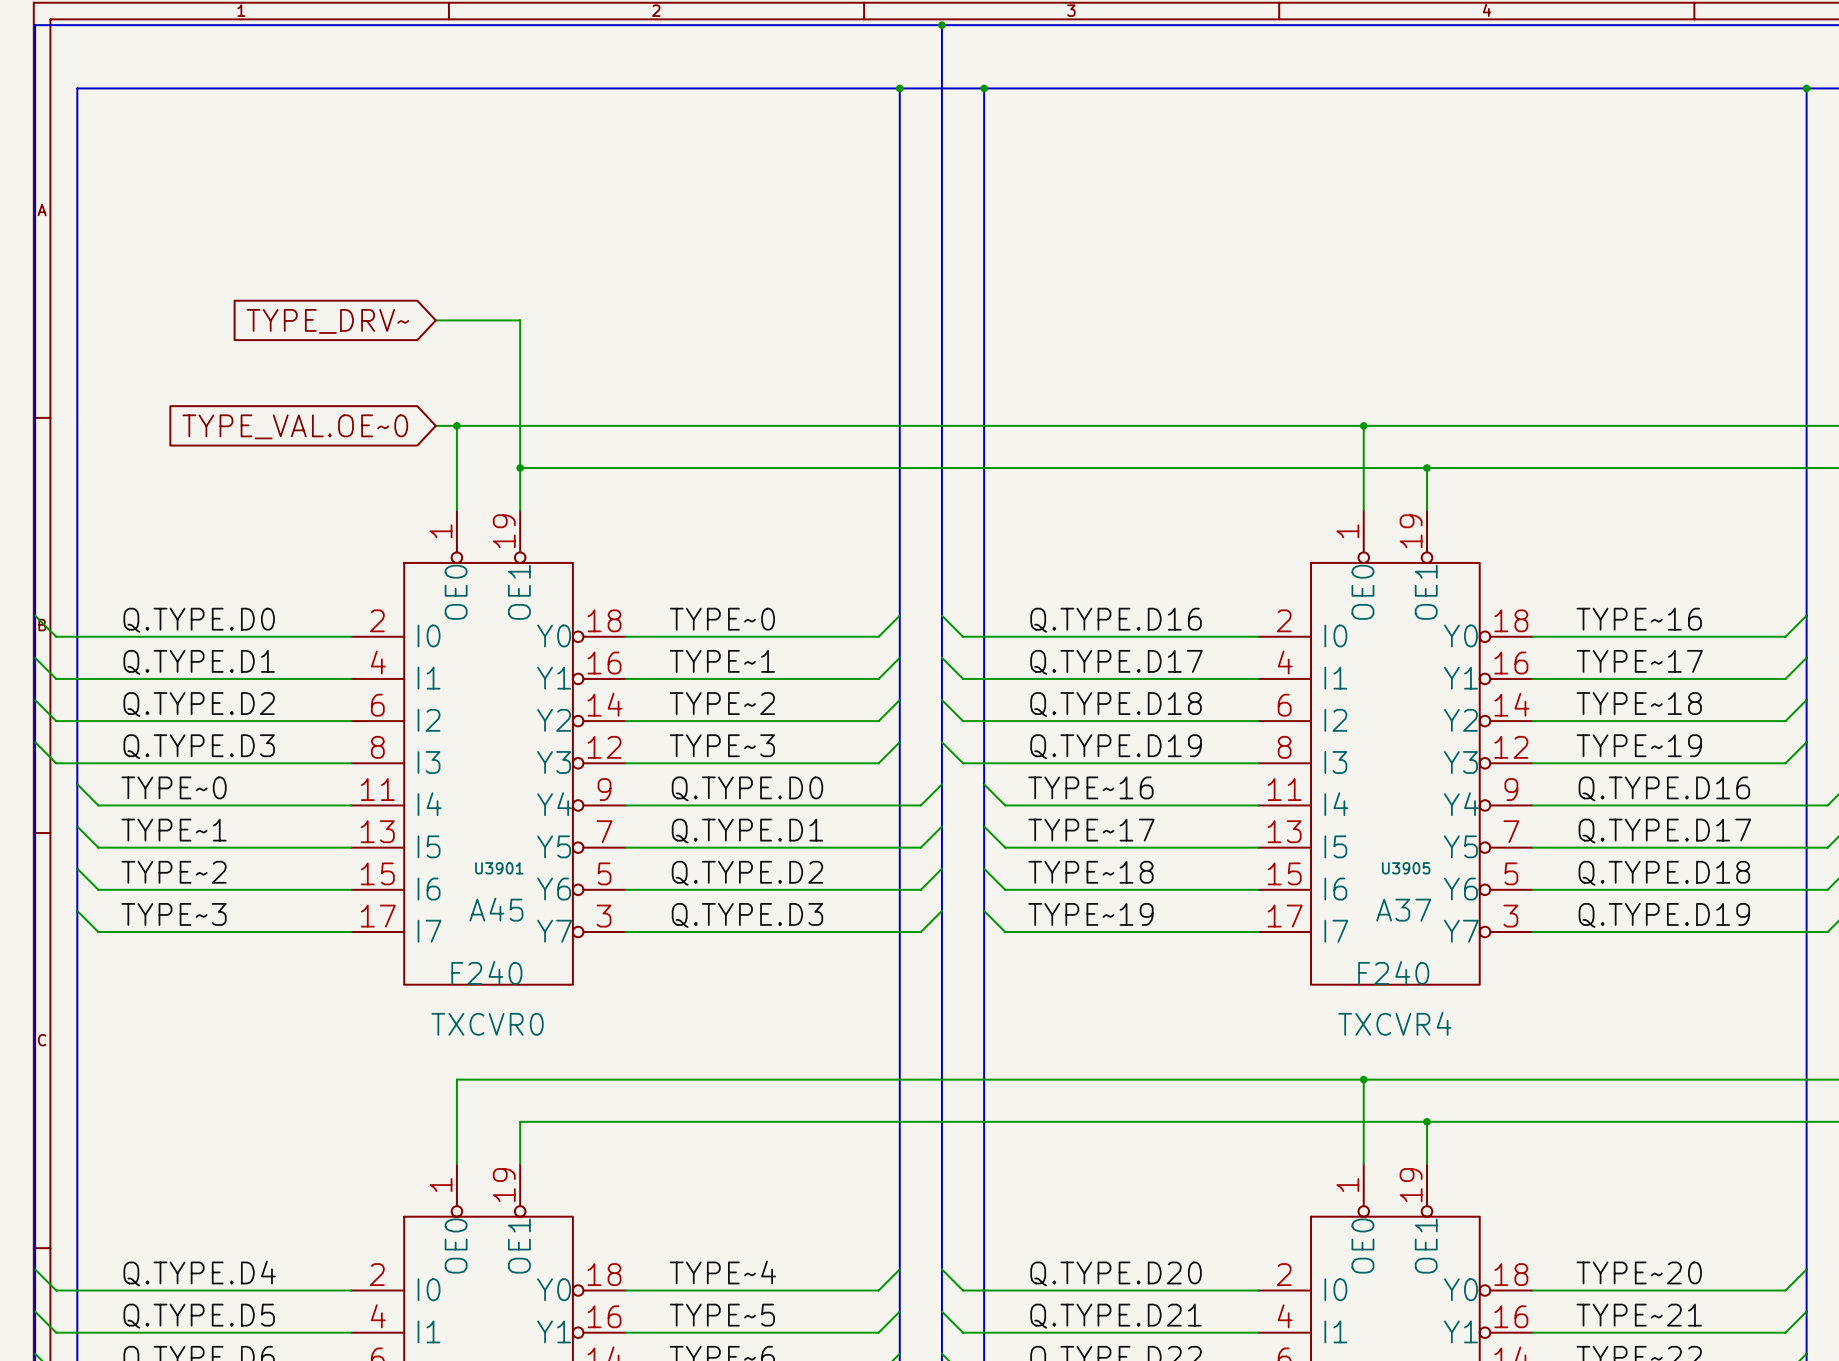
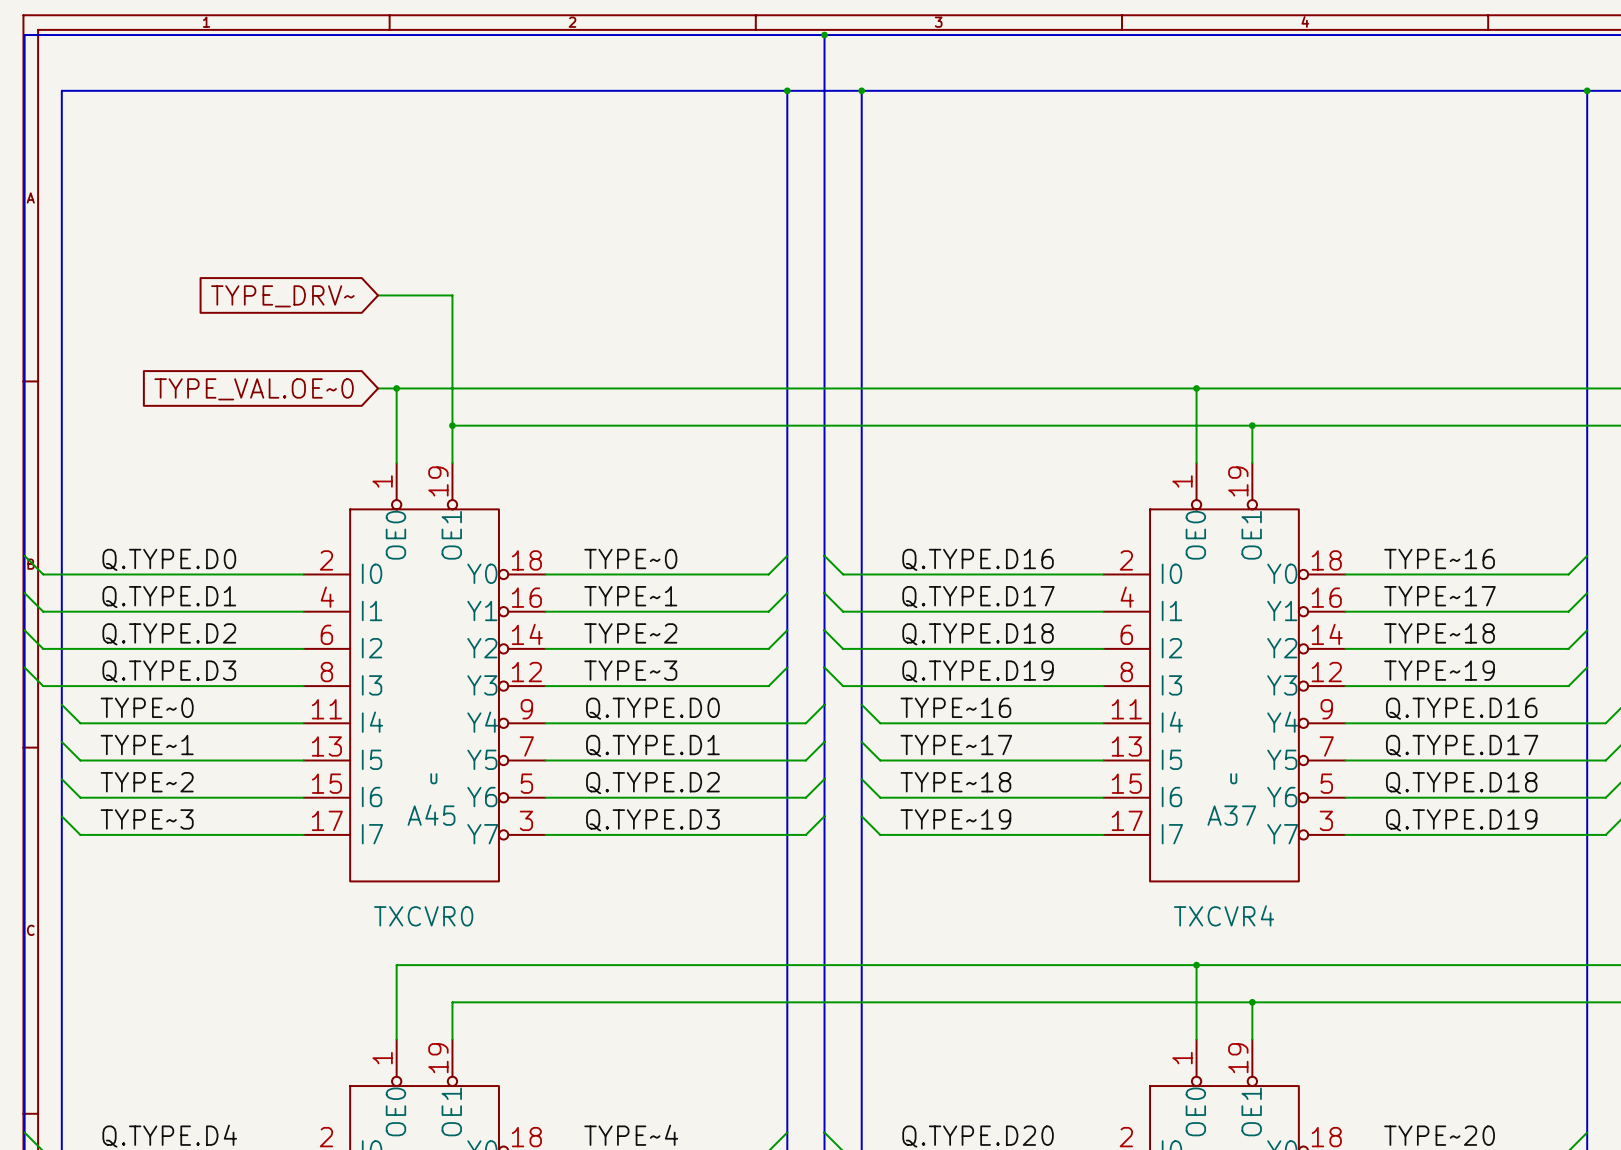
U3901 name: U3901 (499, 868) -> U (433, 778)
U3905 name: U3905 (1406, 868) -> U (1233, 778)
U3901 value: F240 (486, 972) -> none
U3905 value: F240 (1393, 972) -> none

